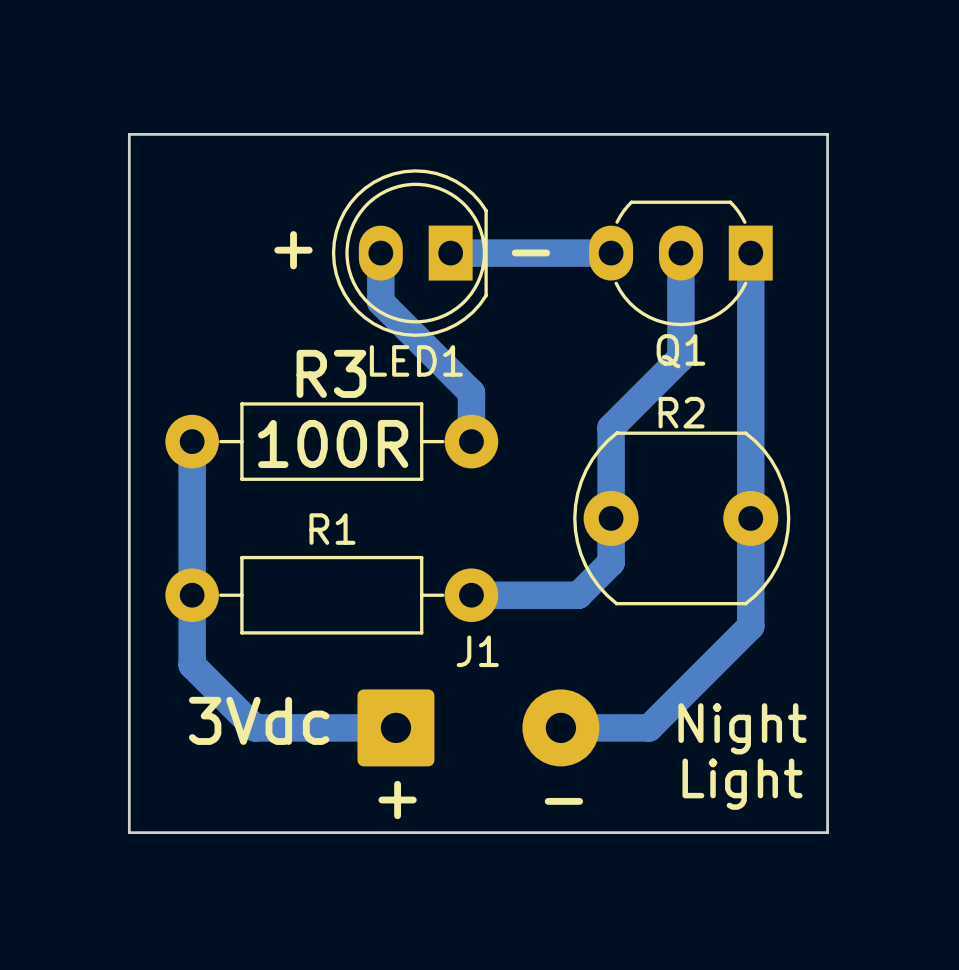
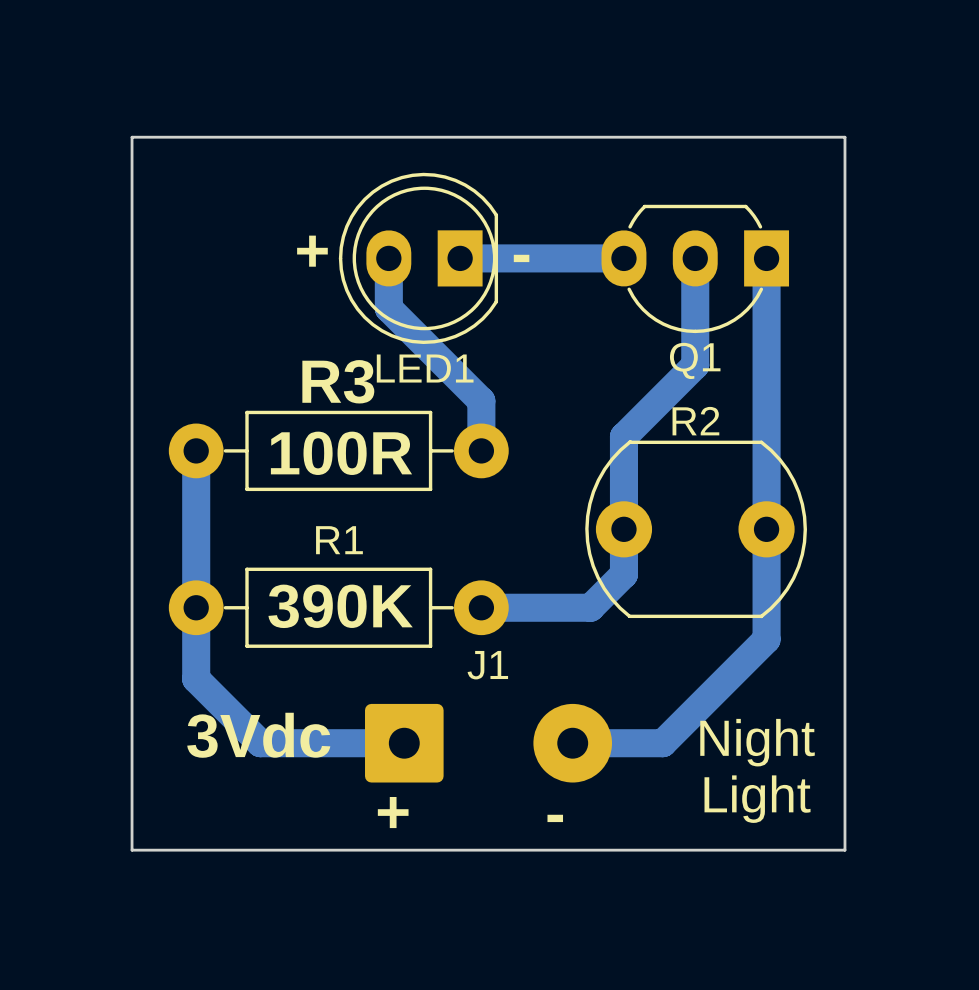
R1 value: none -> 390K (340, 606)

